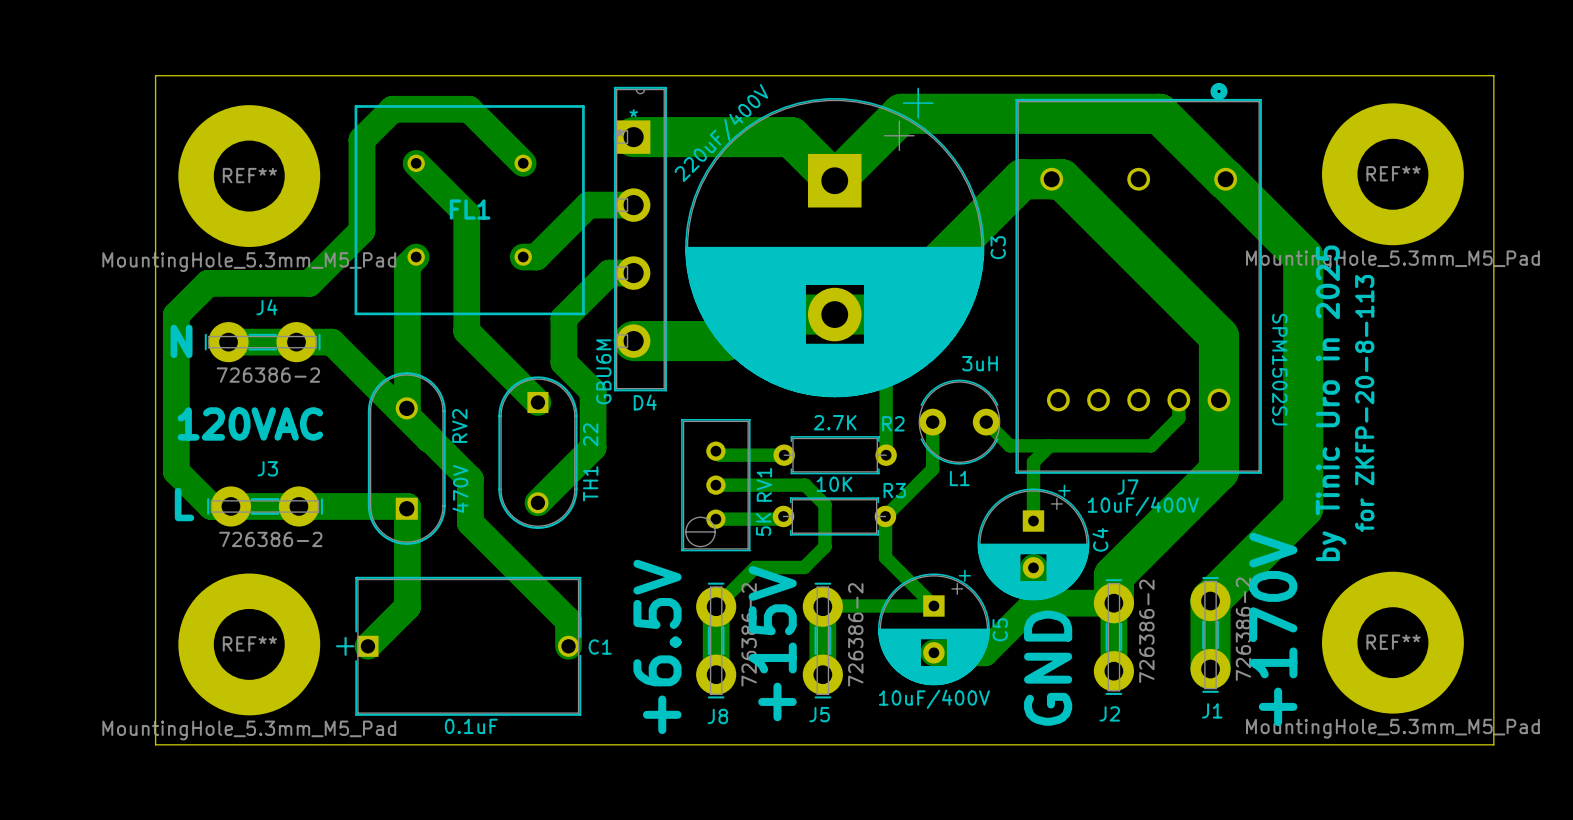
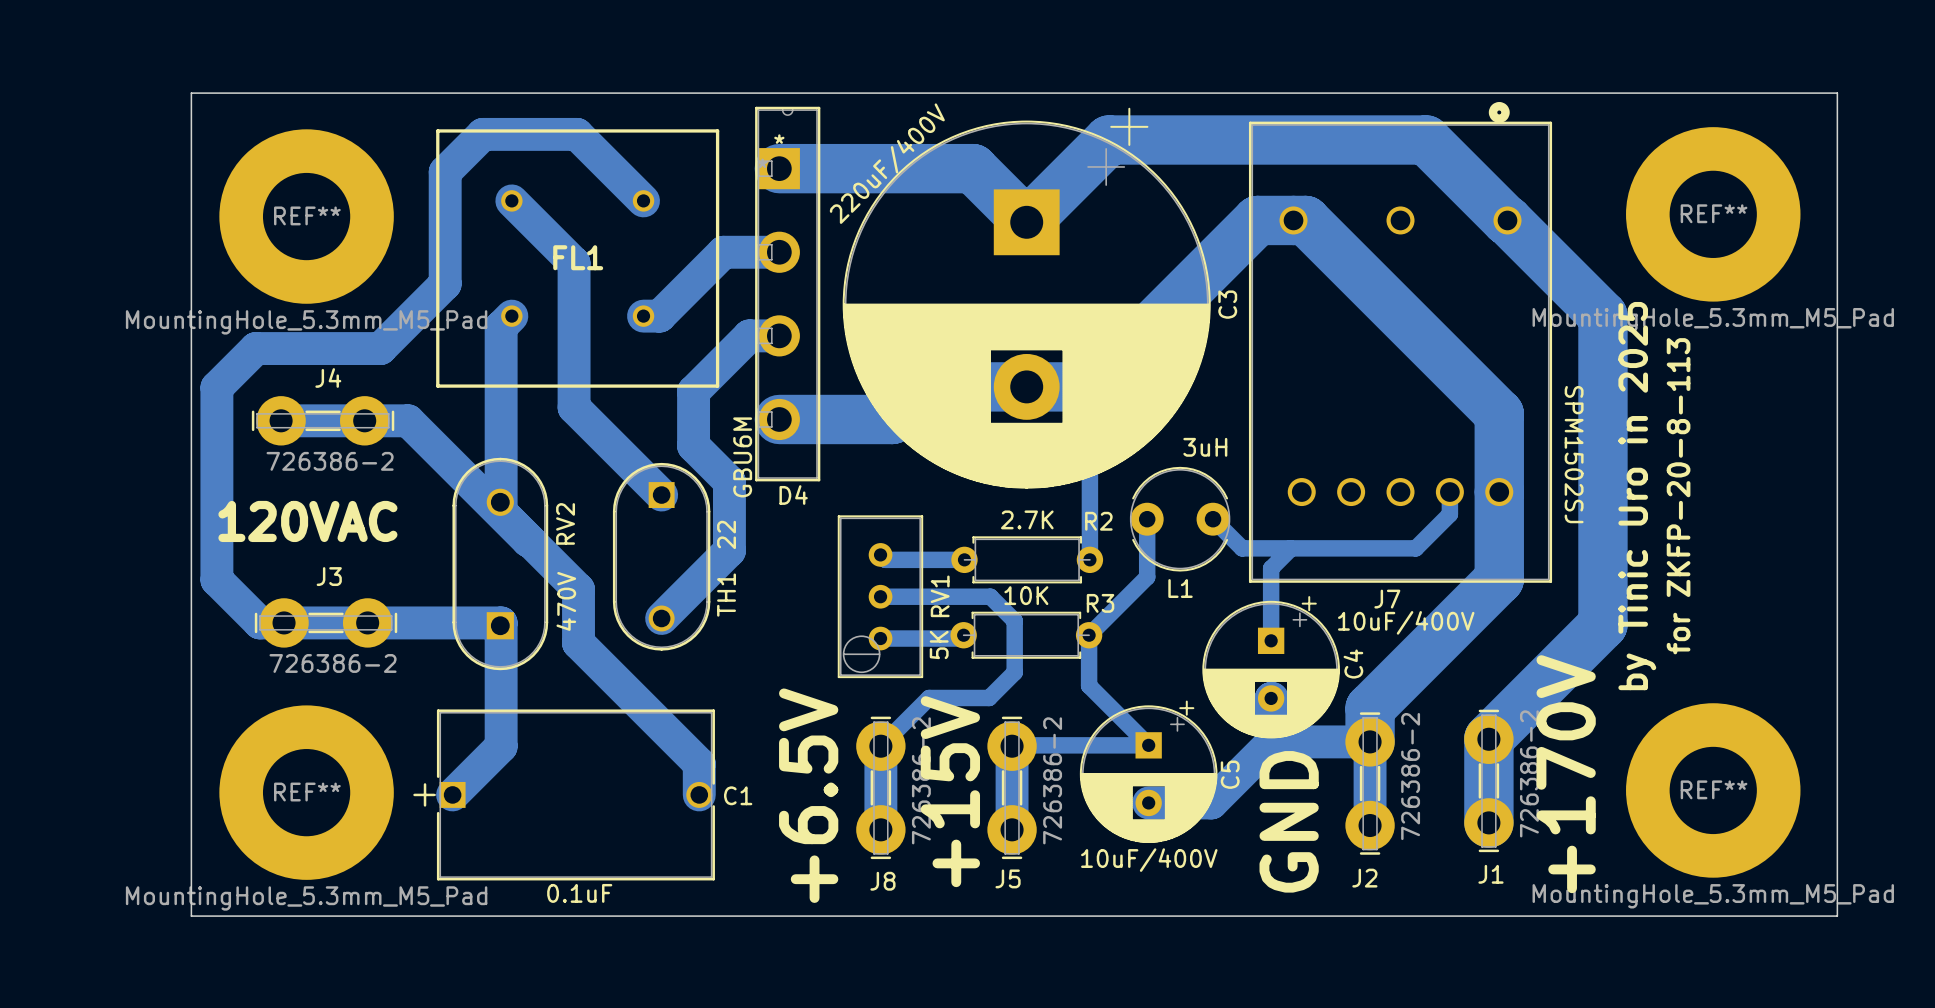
text: N (181, 341) -> none
text: L (184, 504) -> none

